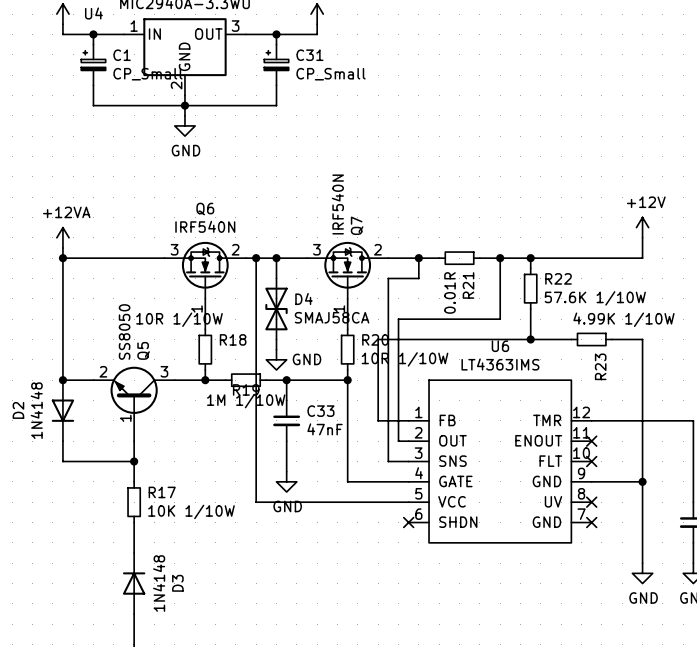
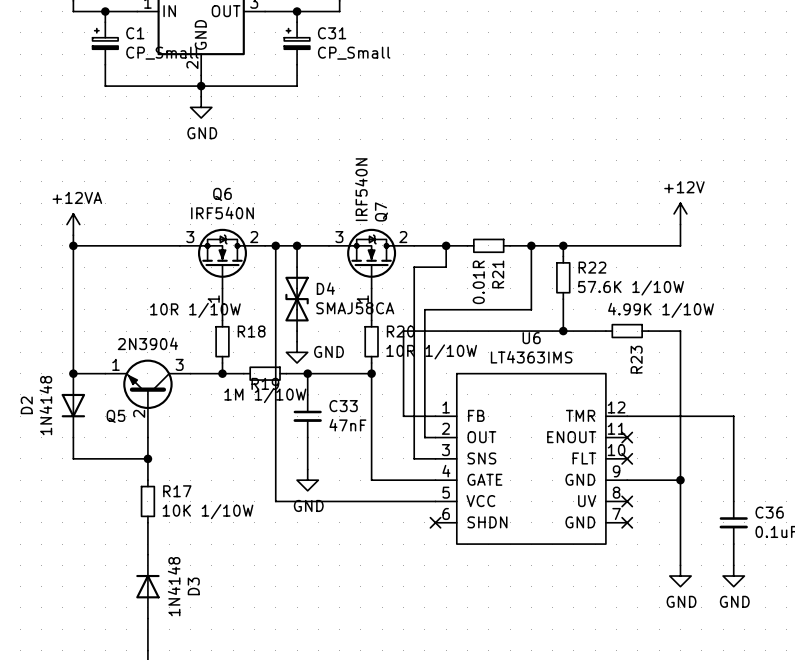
Q5 value: SS8050 (124, 332) -> 2N3904 (147, 343)
Q5 name rotation: 0° (143, 350) -> 90° clockwise (115, 416)
Q5 name position: Q5 (143, 350) -> Q5 (115, 416)
Q5 pin number: 2 (103, 371) -> 1 (115, 364)
Q5 pin number: 1 (125, 418) -> 2 (139, 413)

